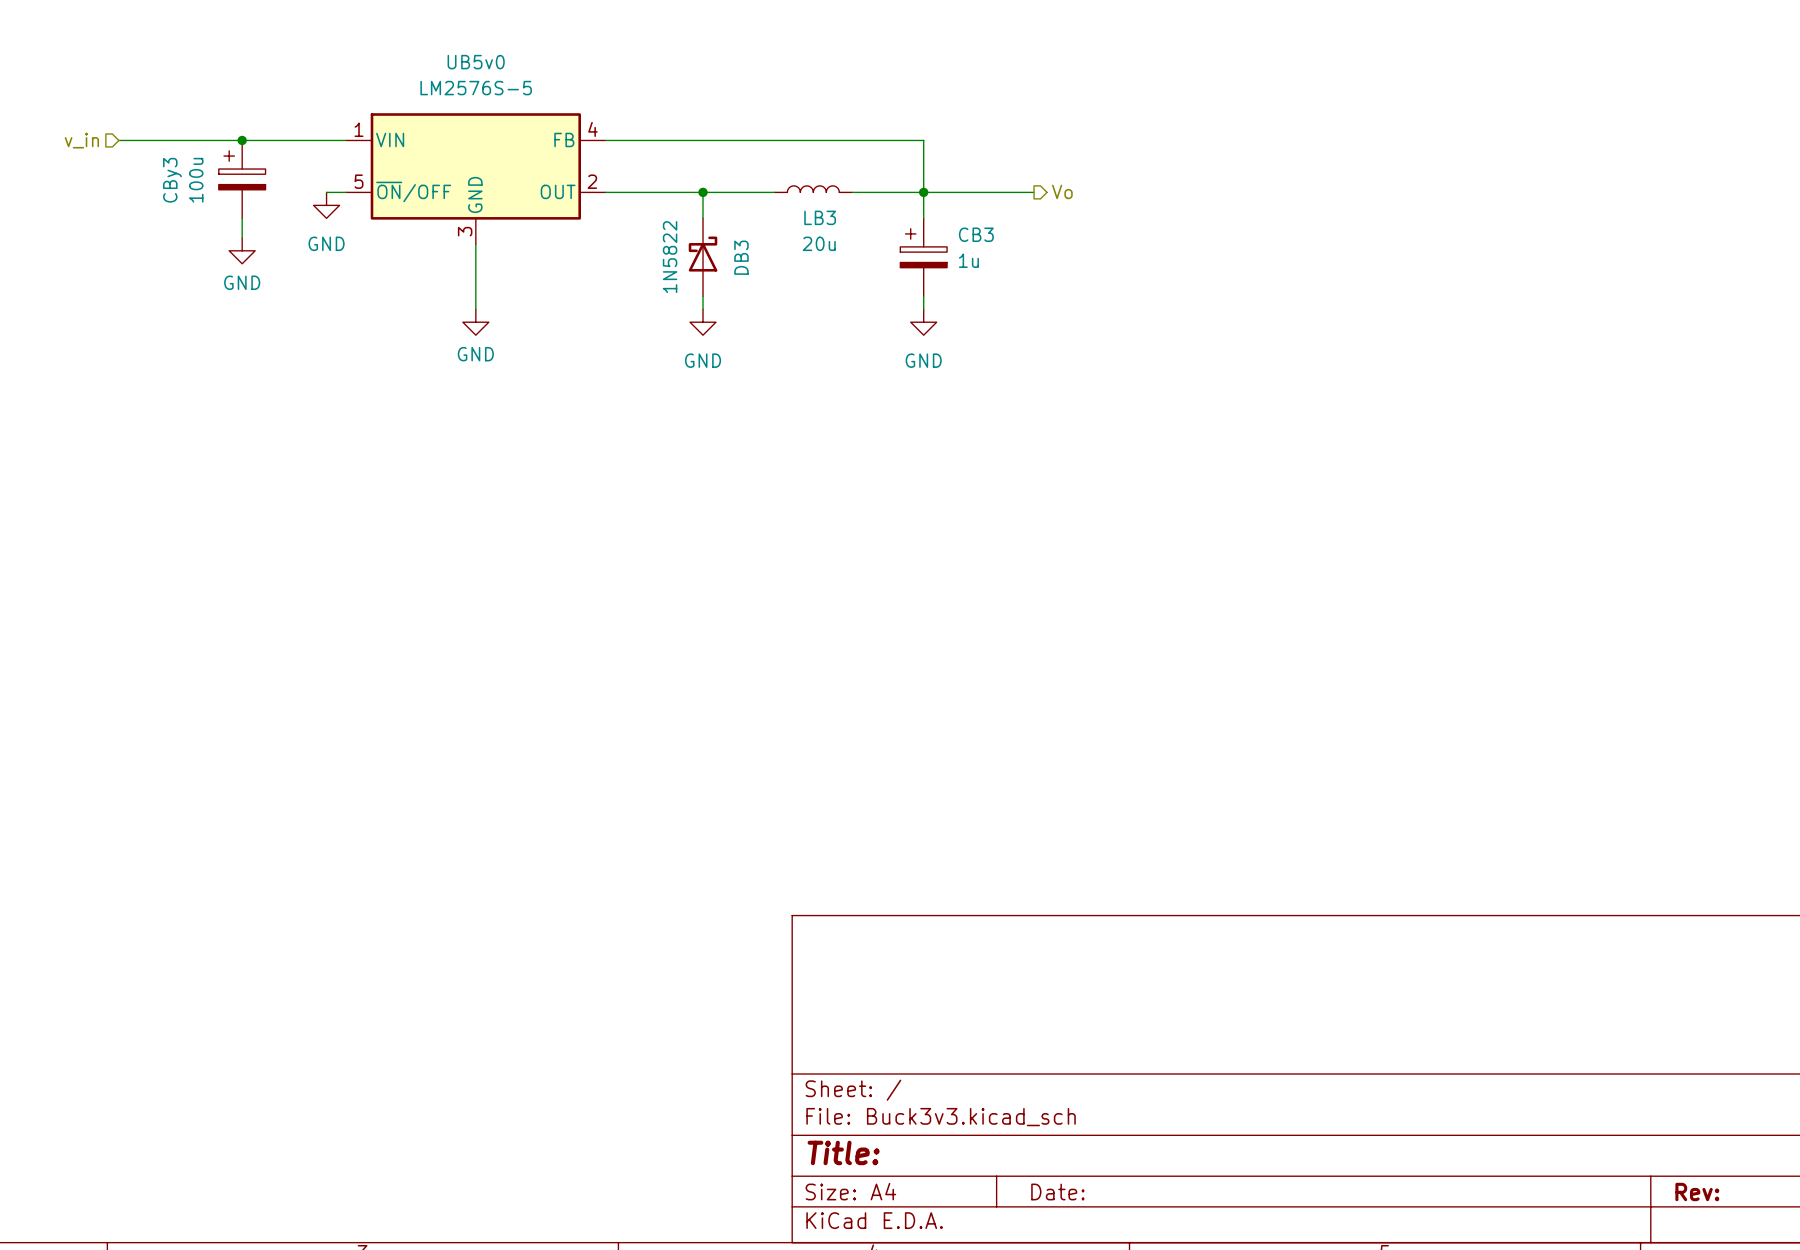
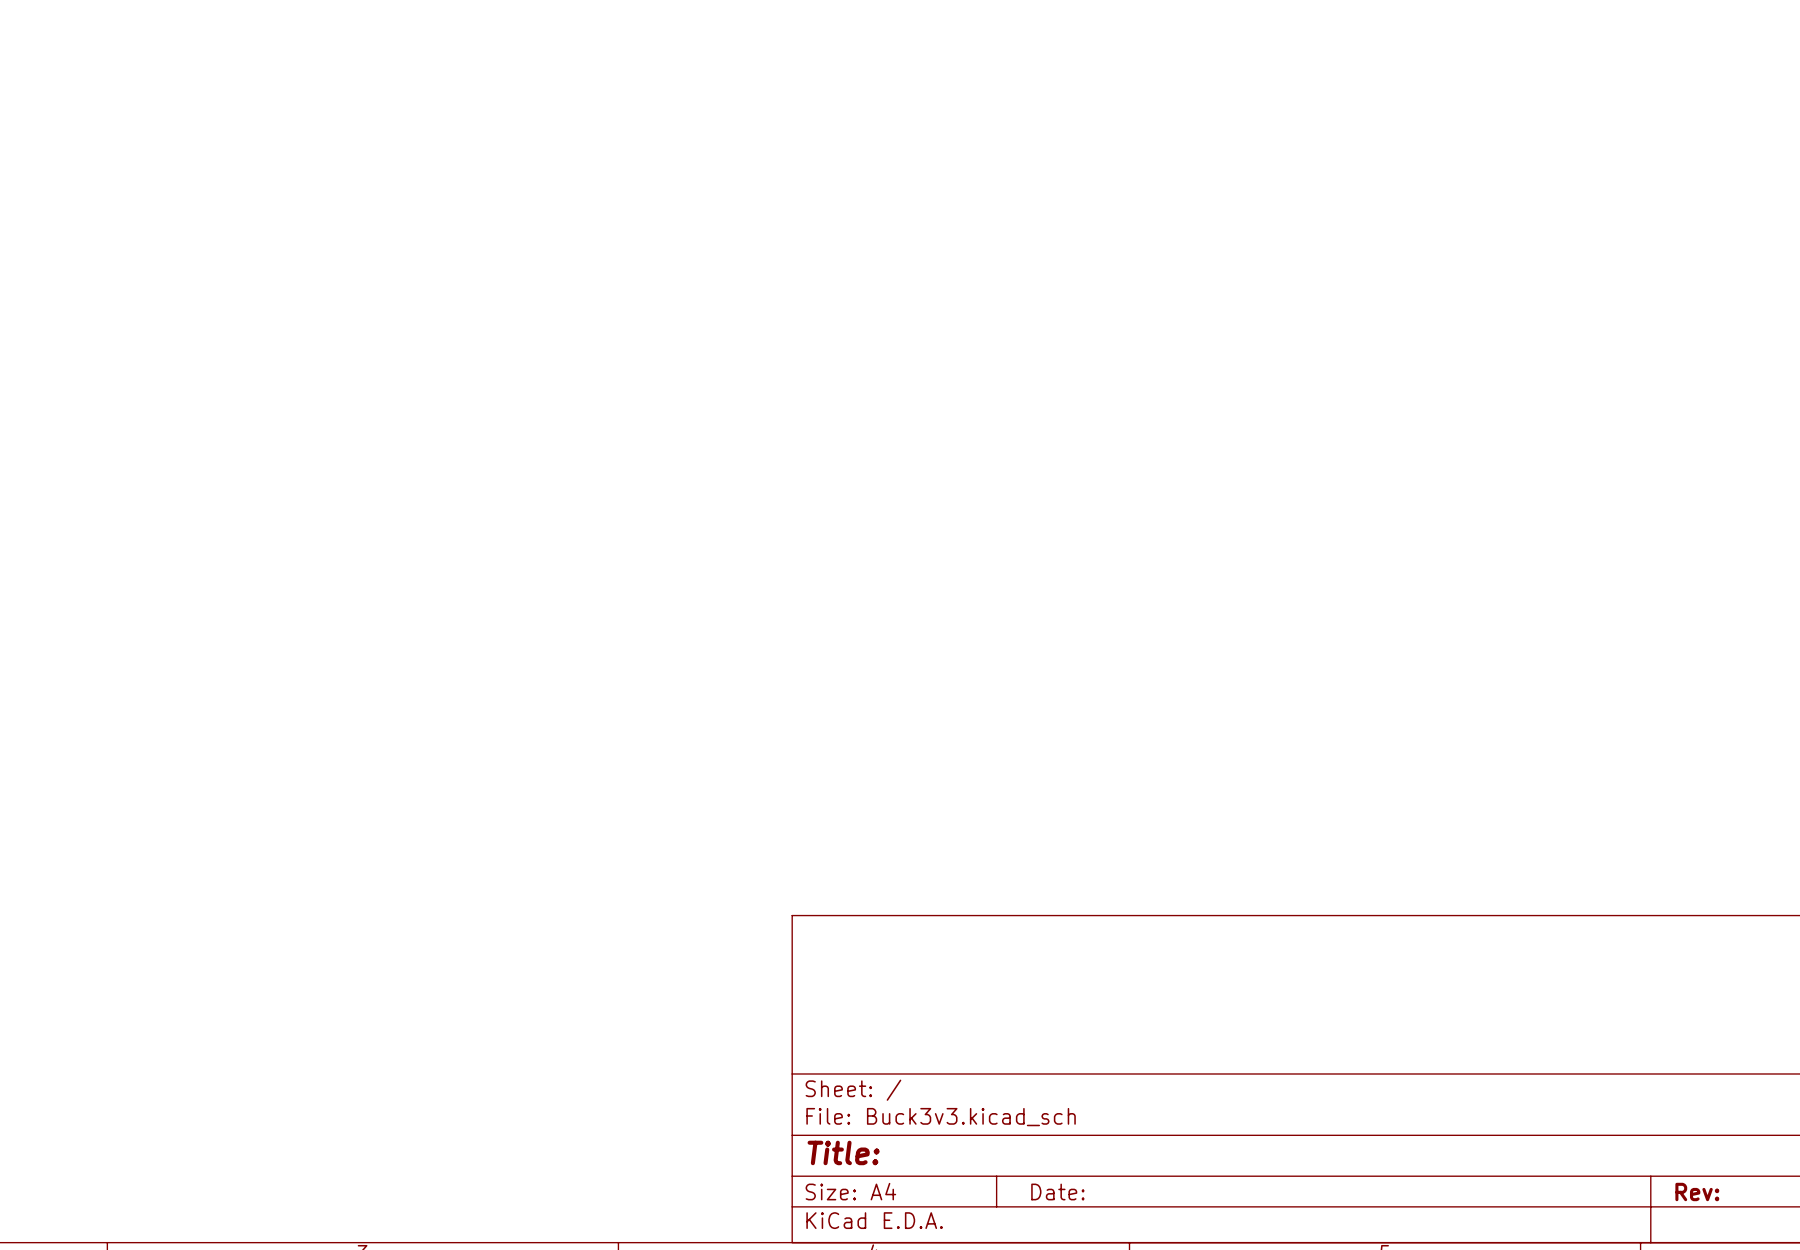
hierarchical label: v_in (81, 140) -> none
wire: (118, 140) (346, 140) -> none
junction: (242, 140) -> none
wire: (605, 140) (923, 140) (923, 218) -> none
UB5v0: LM2576S-5 (475, 178) -> none
CBy3: 100u (242, 179) -> none
LB3: 20u (813, 189) -> none
hierarchical label: Vo (1062, 191) -> none
wire: (326, 192) (346, 192) -> none
wire: (605, 192) (774, 192) -> none
wire: (703, 192) (703, 218) -> none
junction: (703, 192) -> none
wire: (852, 192) (1034, 192) -> none
junction: (923, 192) -> none
power symbol: GND (326, 205) -> none
wire: (242, 218) (242, 237) -> none
wire: (475, 244) (475, 309) -> none
power symbol: GND (242, 250) -> none
DB3: 1N5822 (703, 257) -> none
CB3: 1u (923, 257) -> none
wire: (703, 296) (703, 309) -> none
wire: (923, 296) (923, 309) -> none
power symbol: GND (475, 322) -> none
power symbol: GND (703, 322) -> none
power symbol: GND (923, 322) -> none

